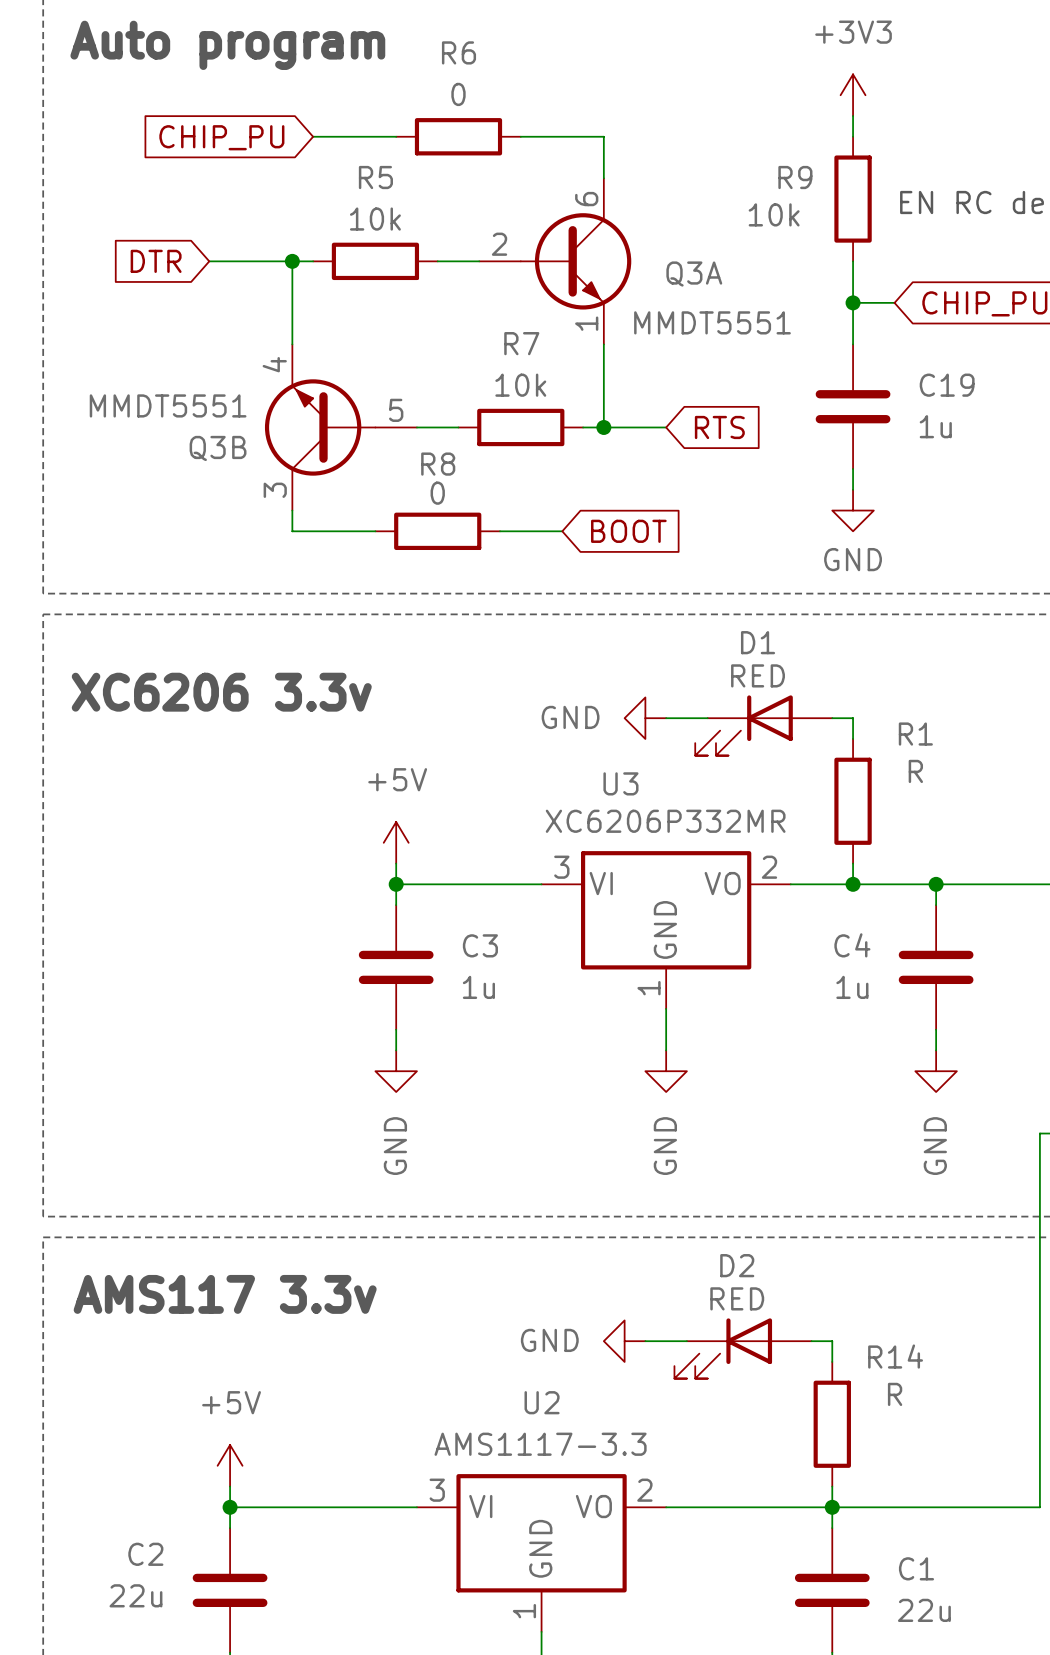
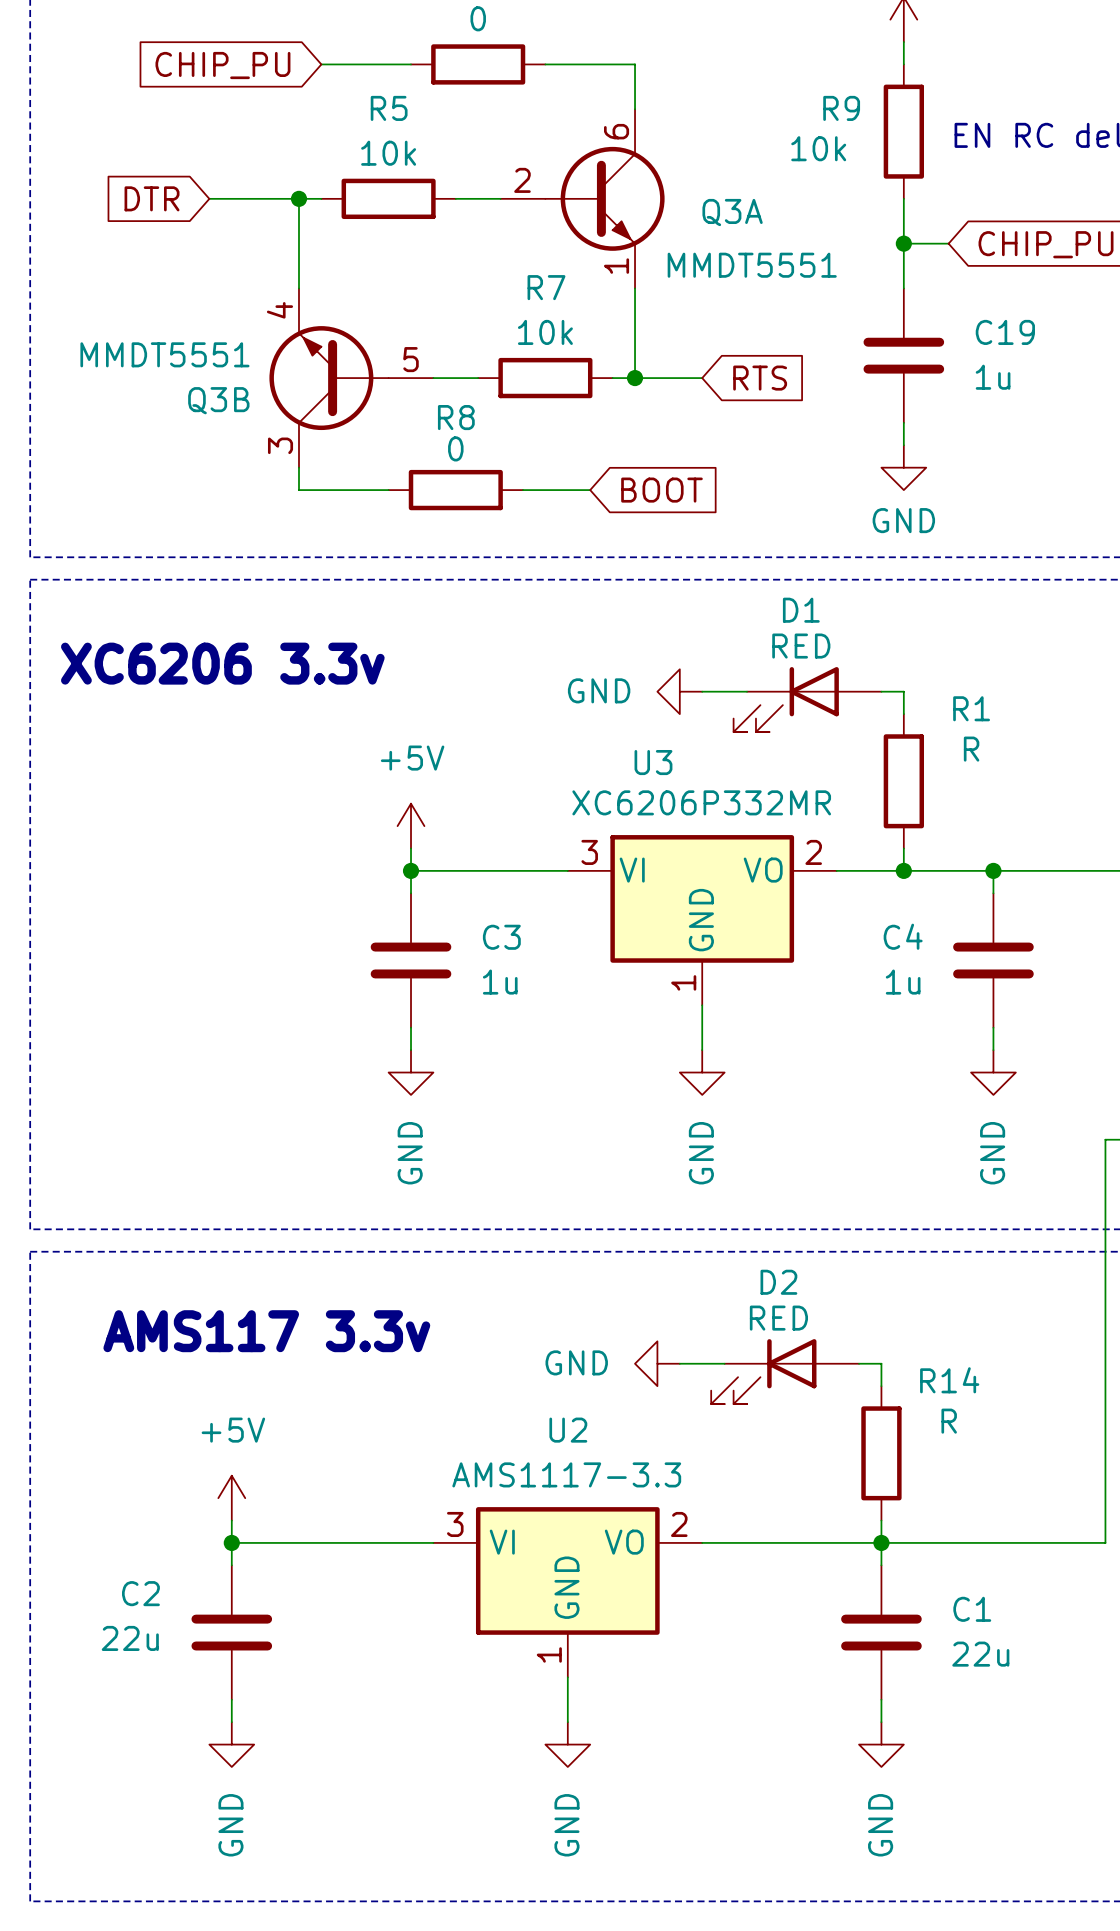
text position: AMS117 3.3v (225, 1294) -> AMS117 3.3v (266, 1331)

